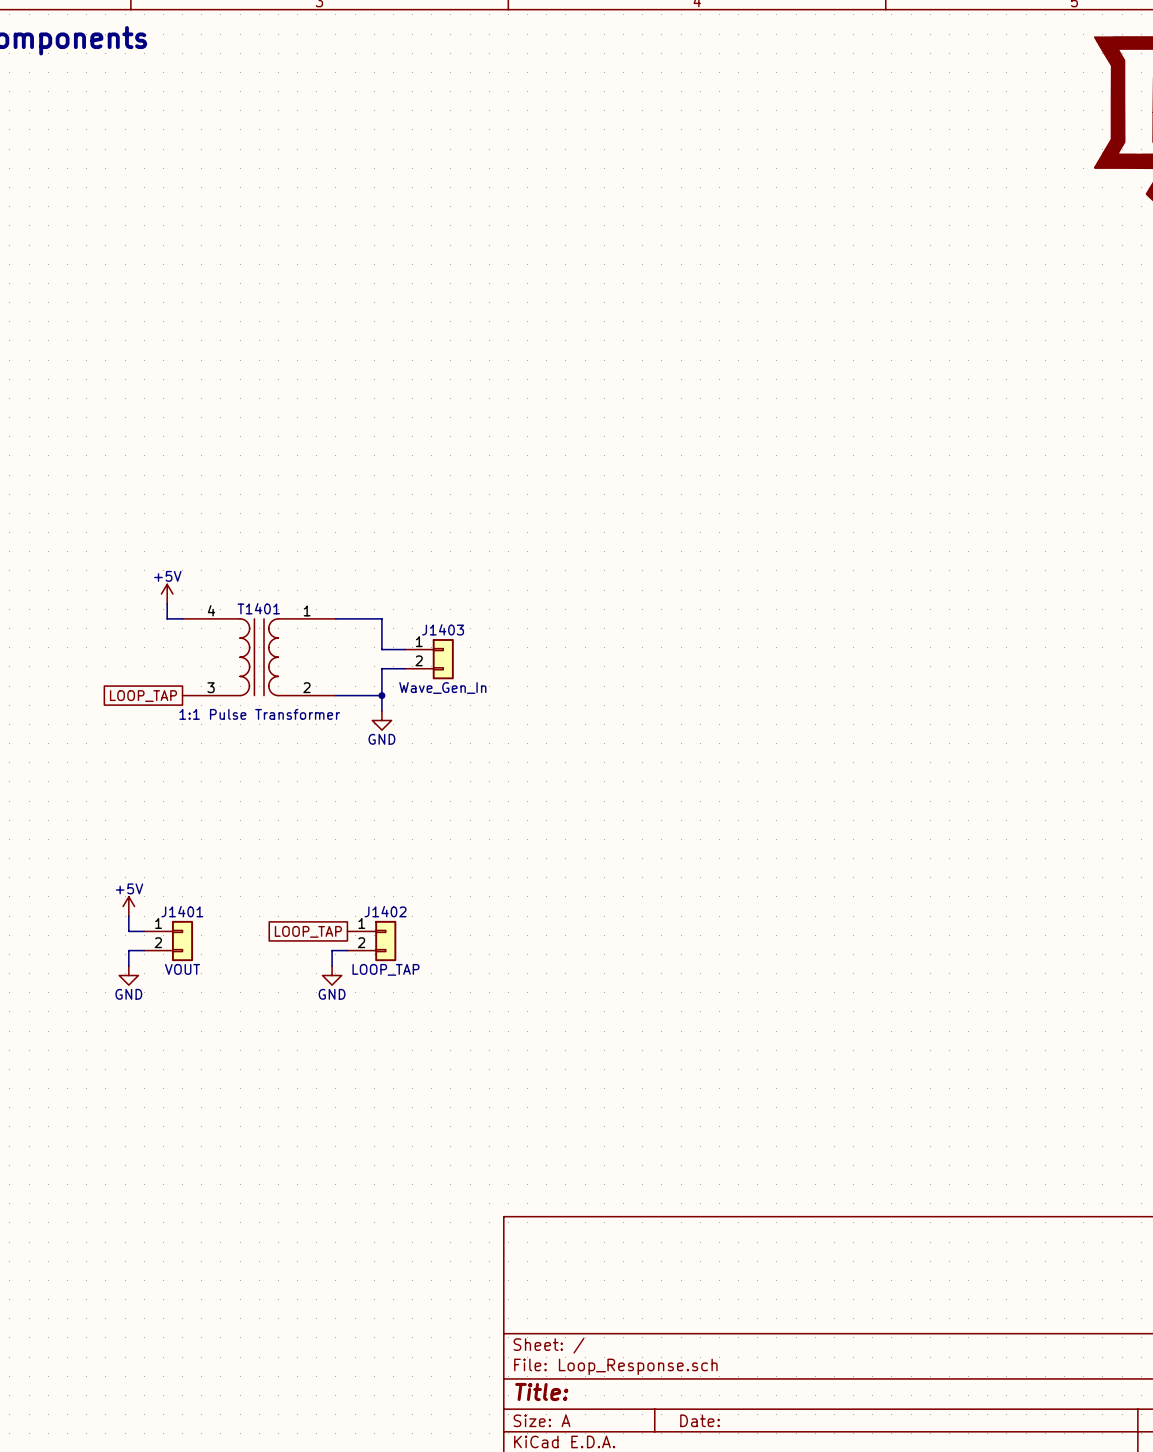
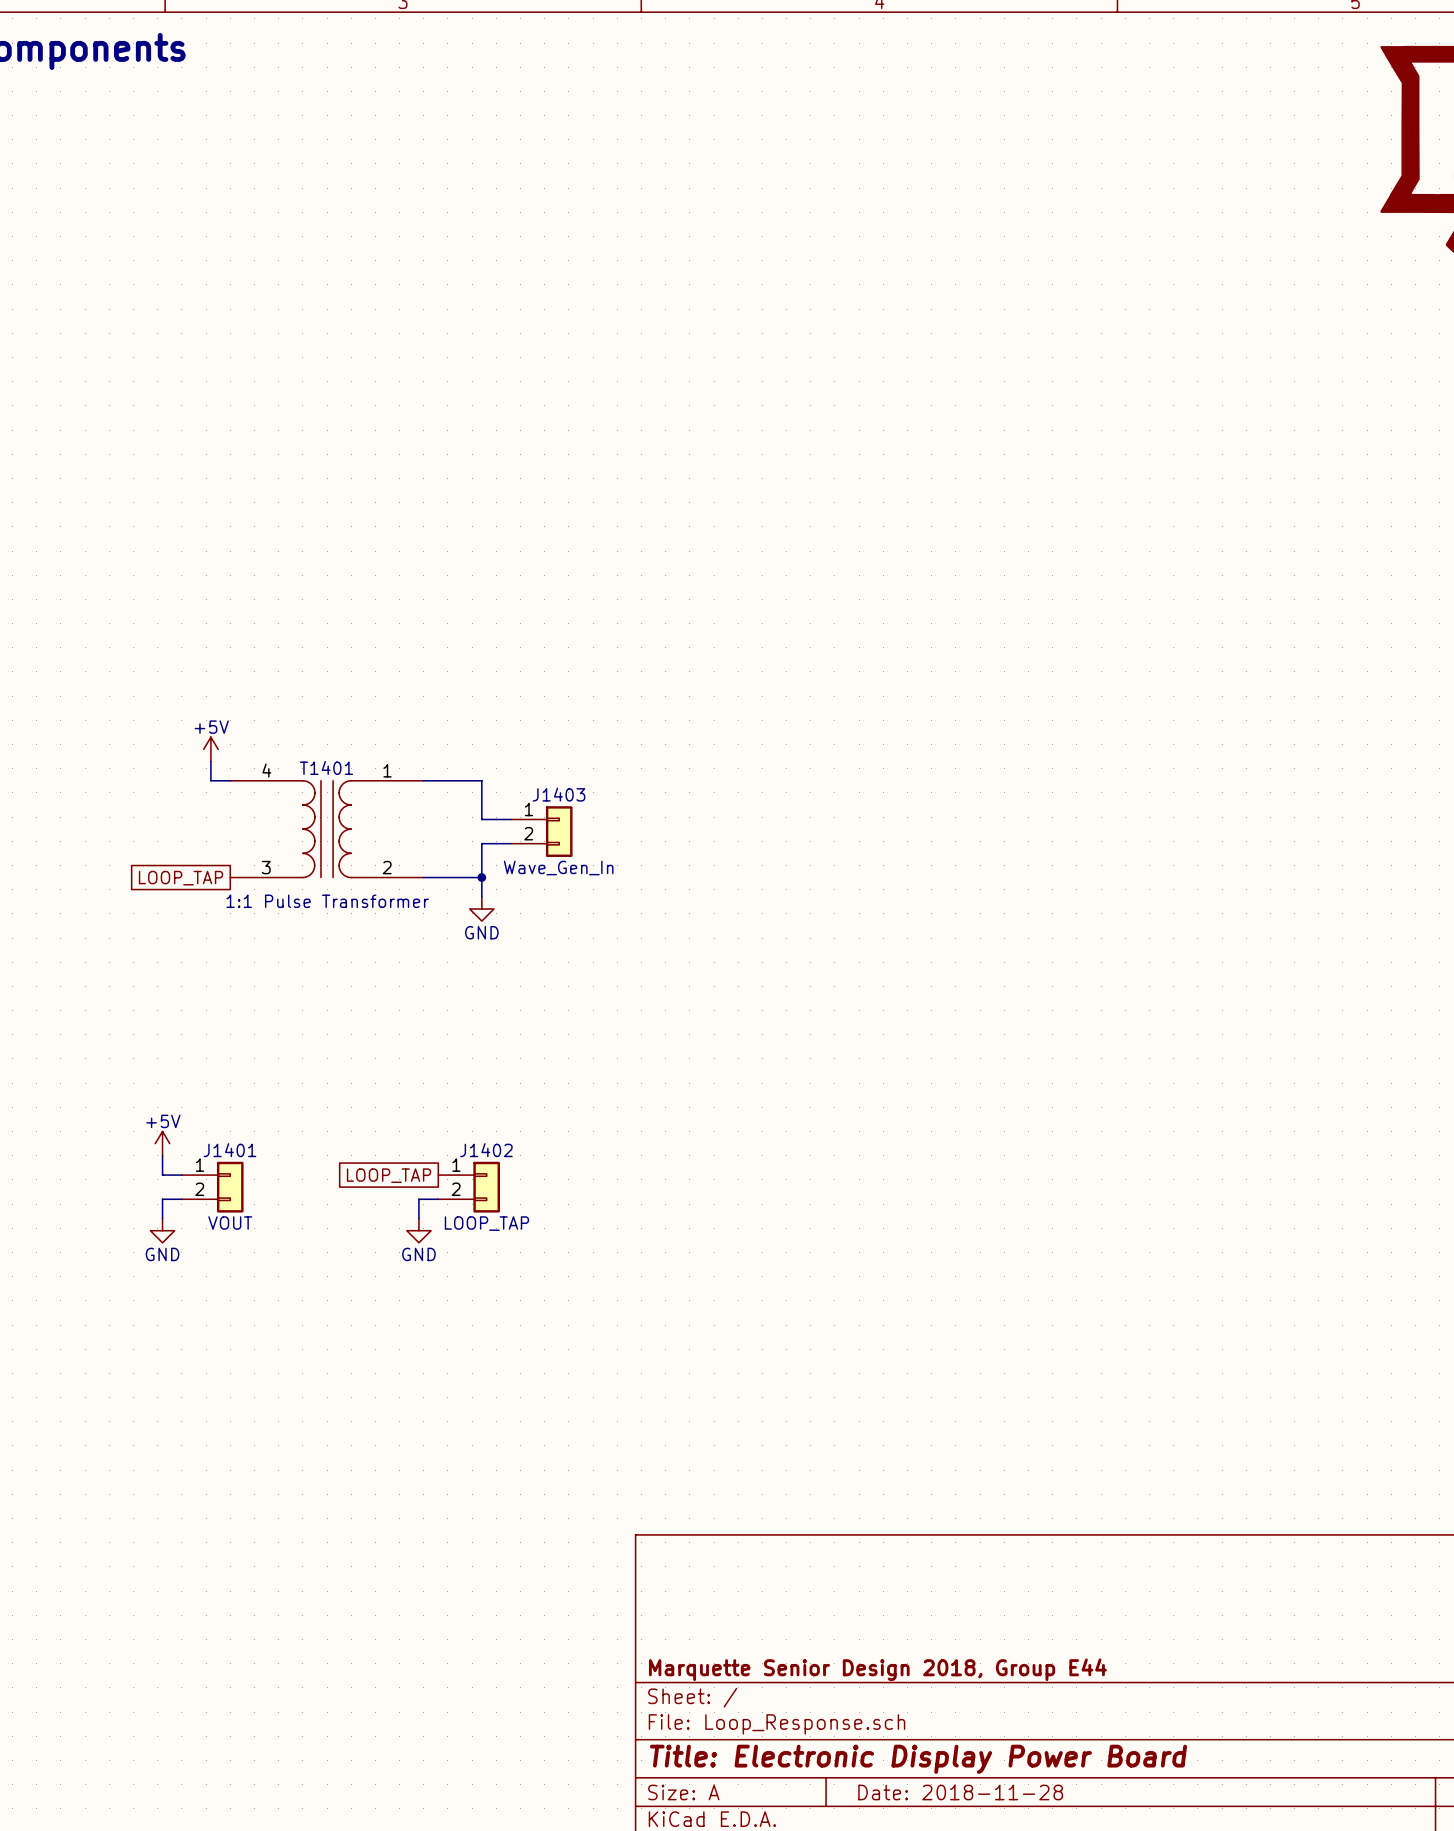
title block: none -> Marquette Senior Design 2018, Group E44 (877, 1669)
title block: Title: (541, 1391) -> Title: Electronic Display Power Board (918, 1759)
title block: Date: (700, 1420) -> Date: 2018-11-28 (960, 1792)

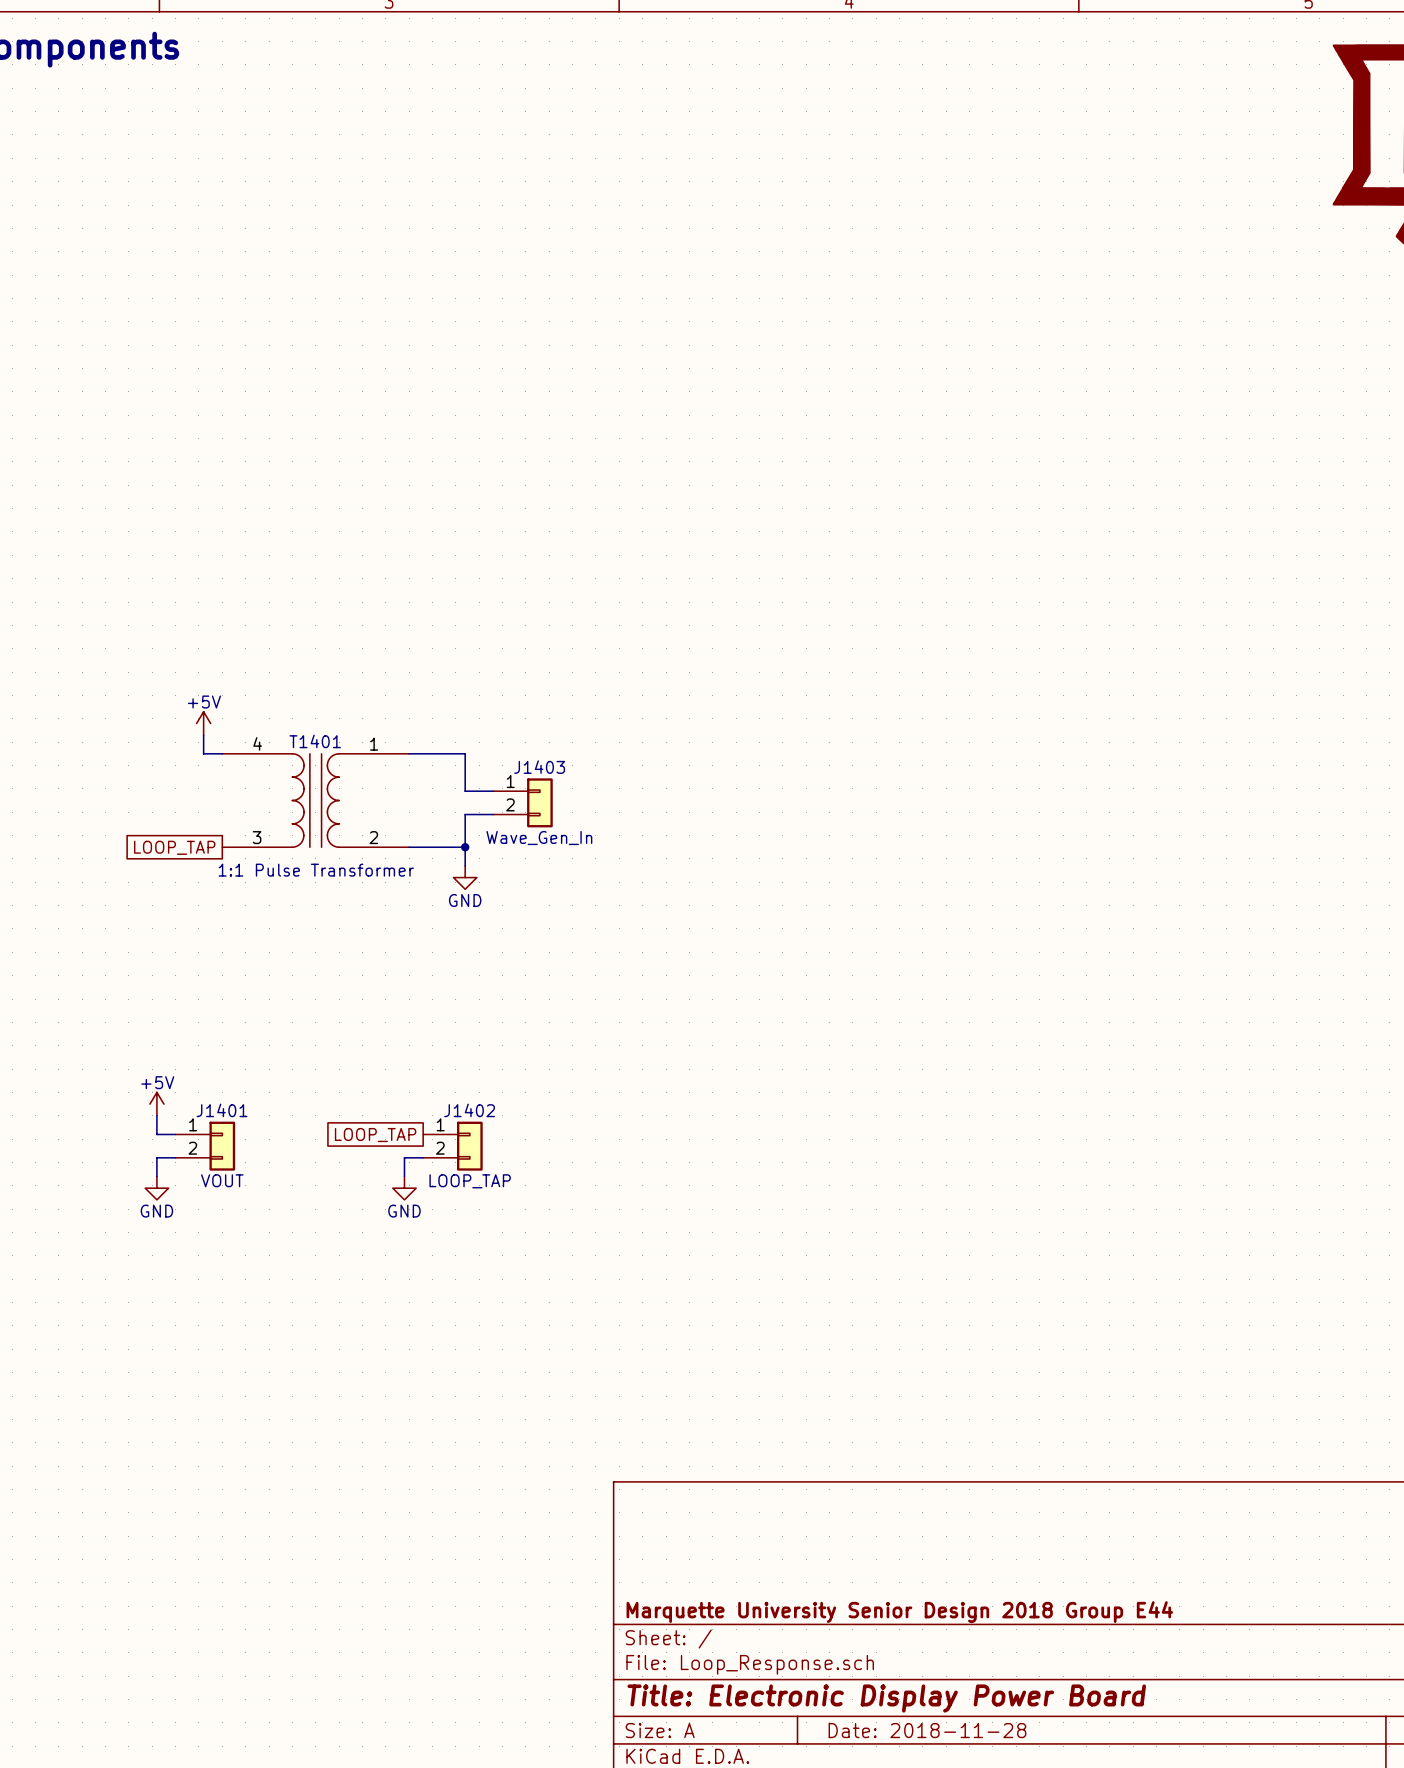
title block: Marquette Senior Design 2018, Group E44 (877, 1669) -> Marquette University Senior Design 2018 Group E44 (899, 1612)

